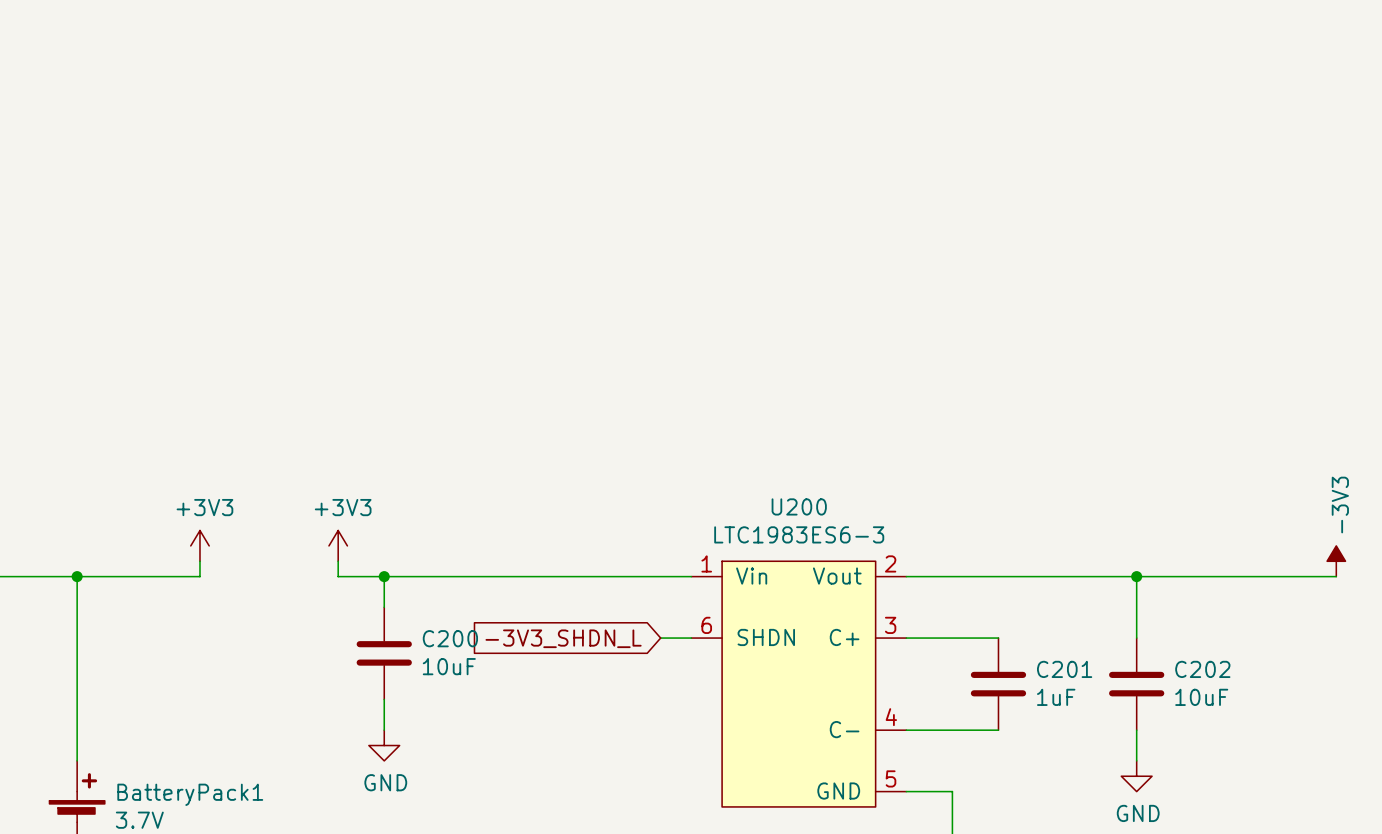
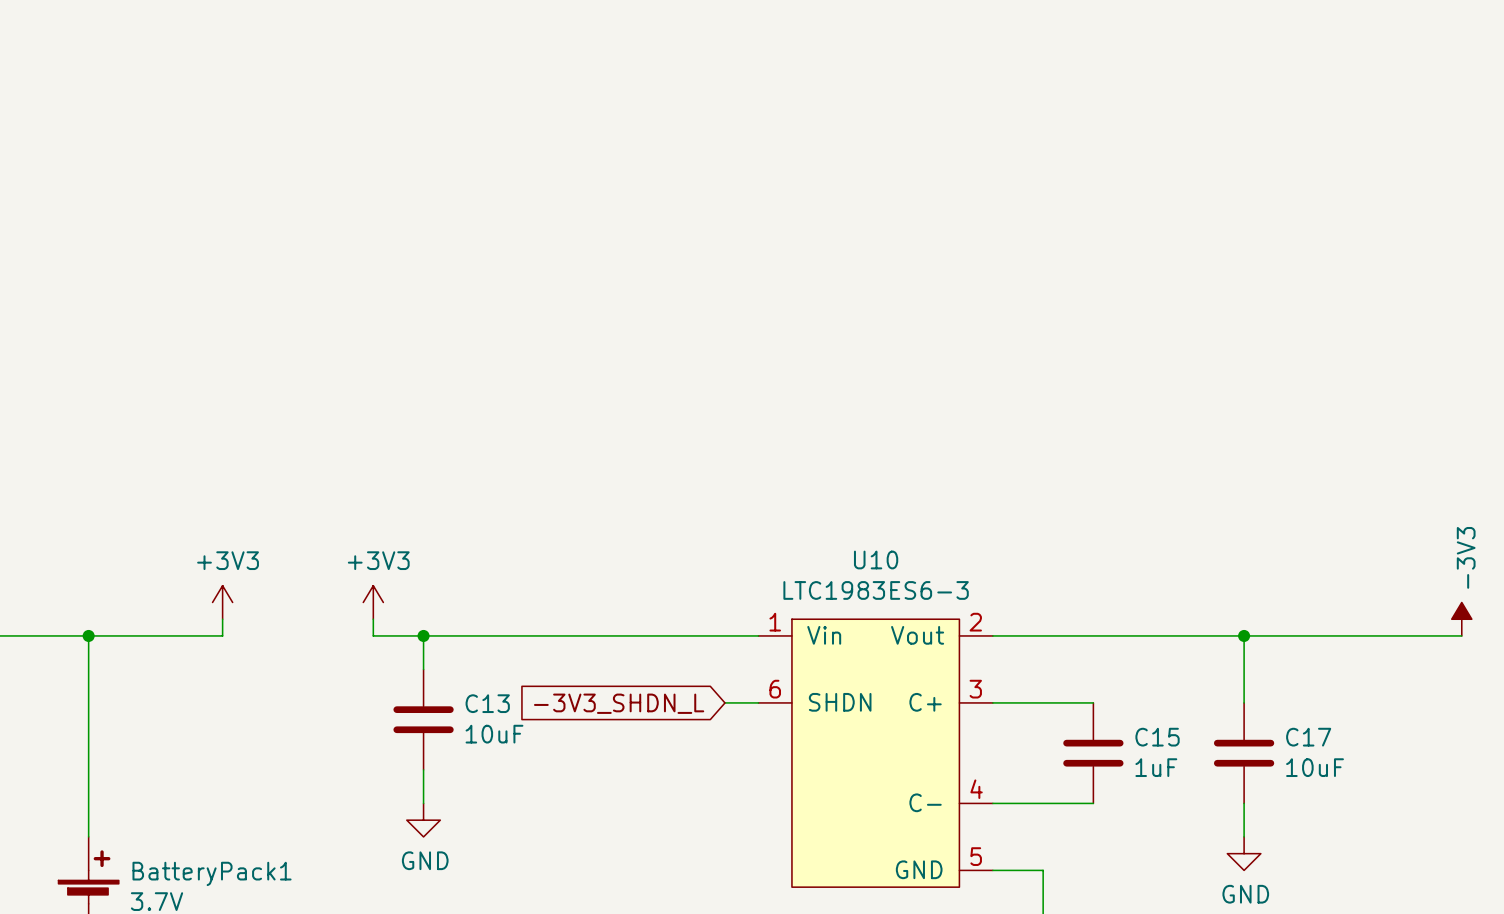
U200 name: U200 (799, 506) -> U10 (876, 559)
C200 name: C200 (450, 638) -> C13 (487, 703)
C201 name: C201 (1064, 669) -> C15 (1157, 737)
C202 name: C202 (1202, 669) -> C17 (1308, 737)

